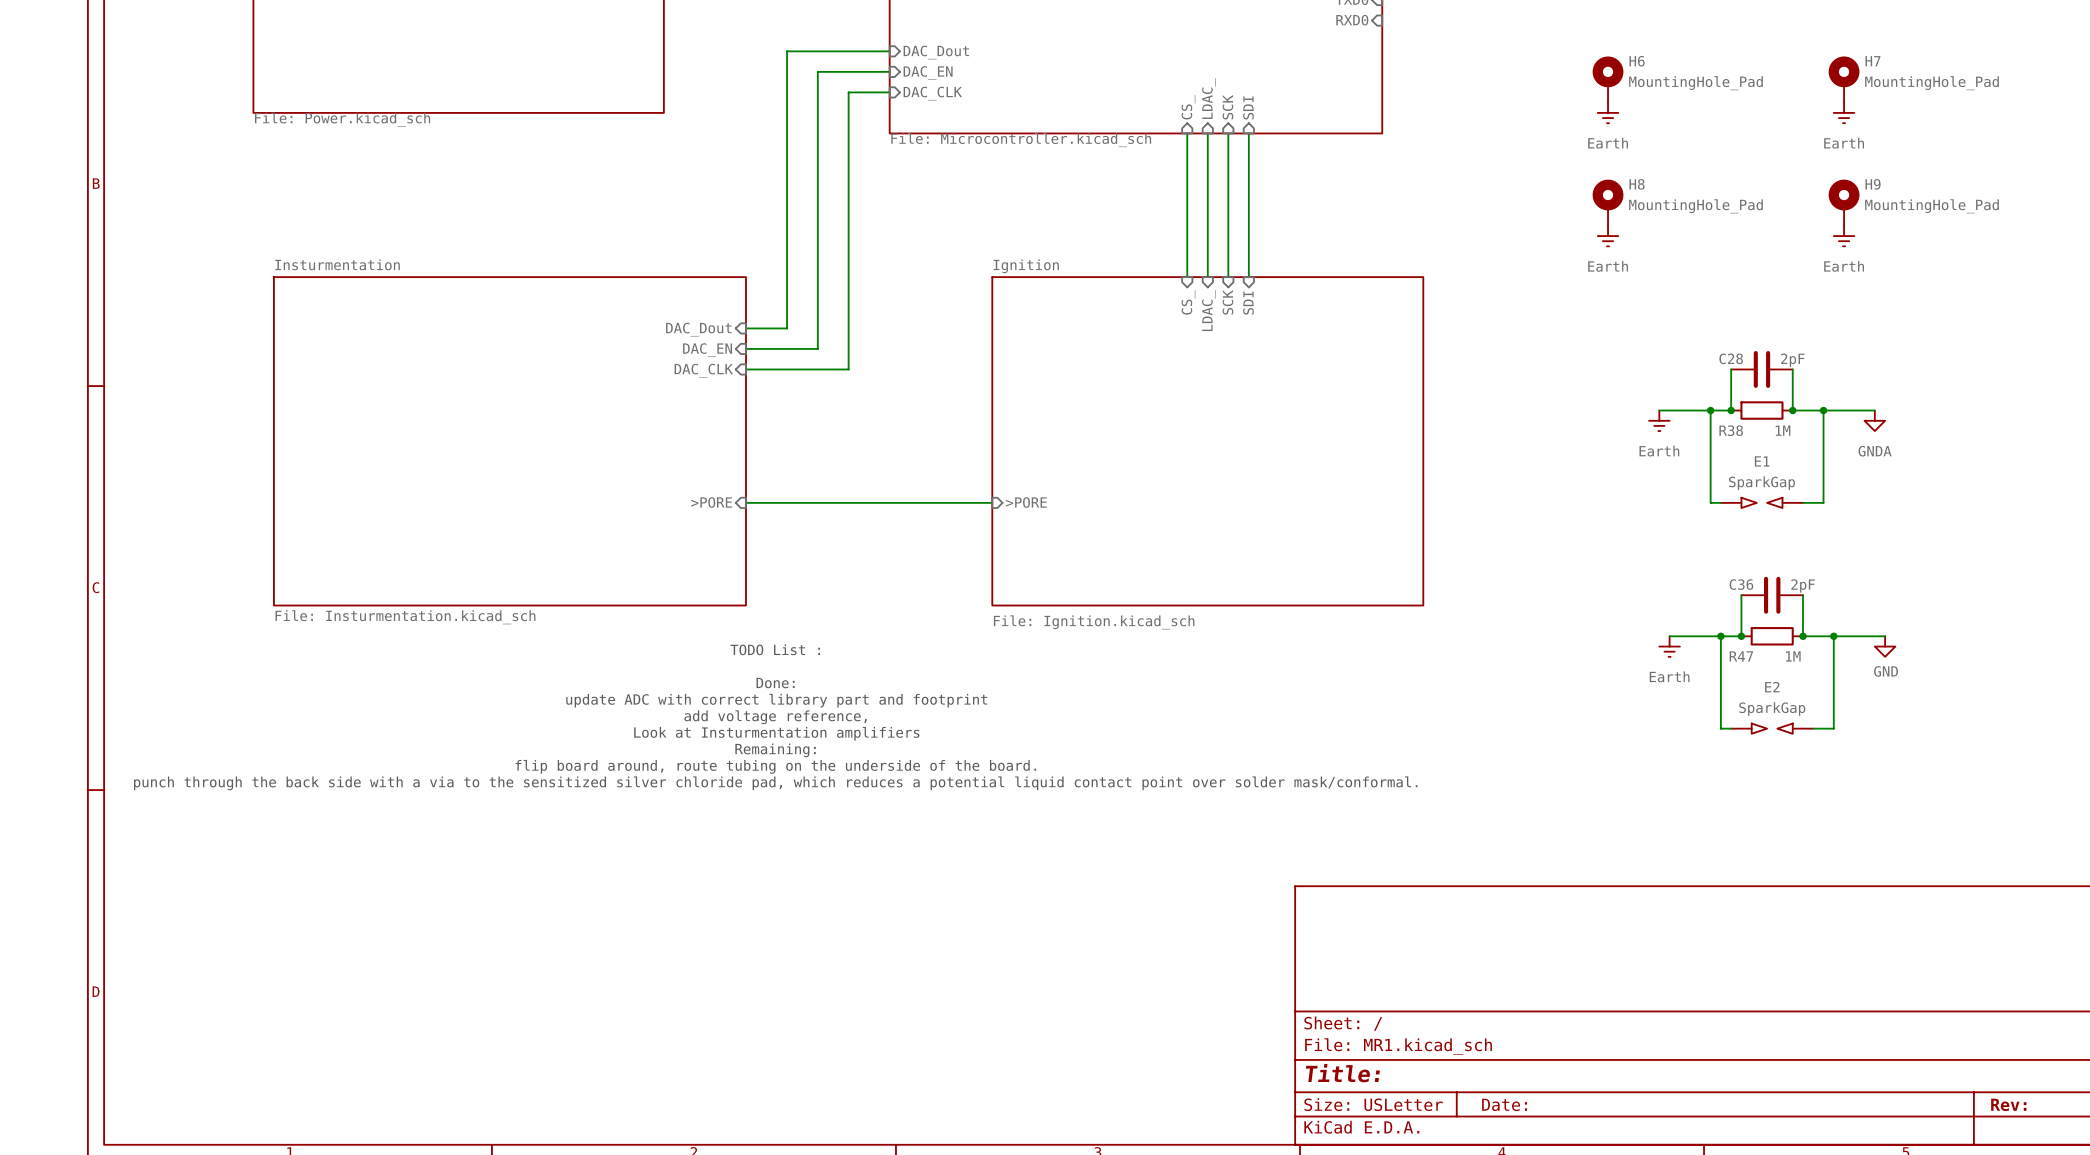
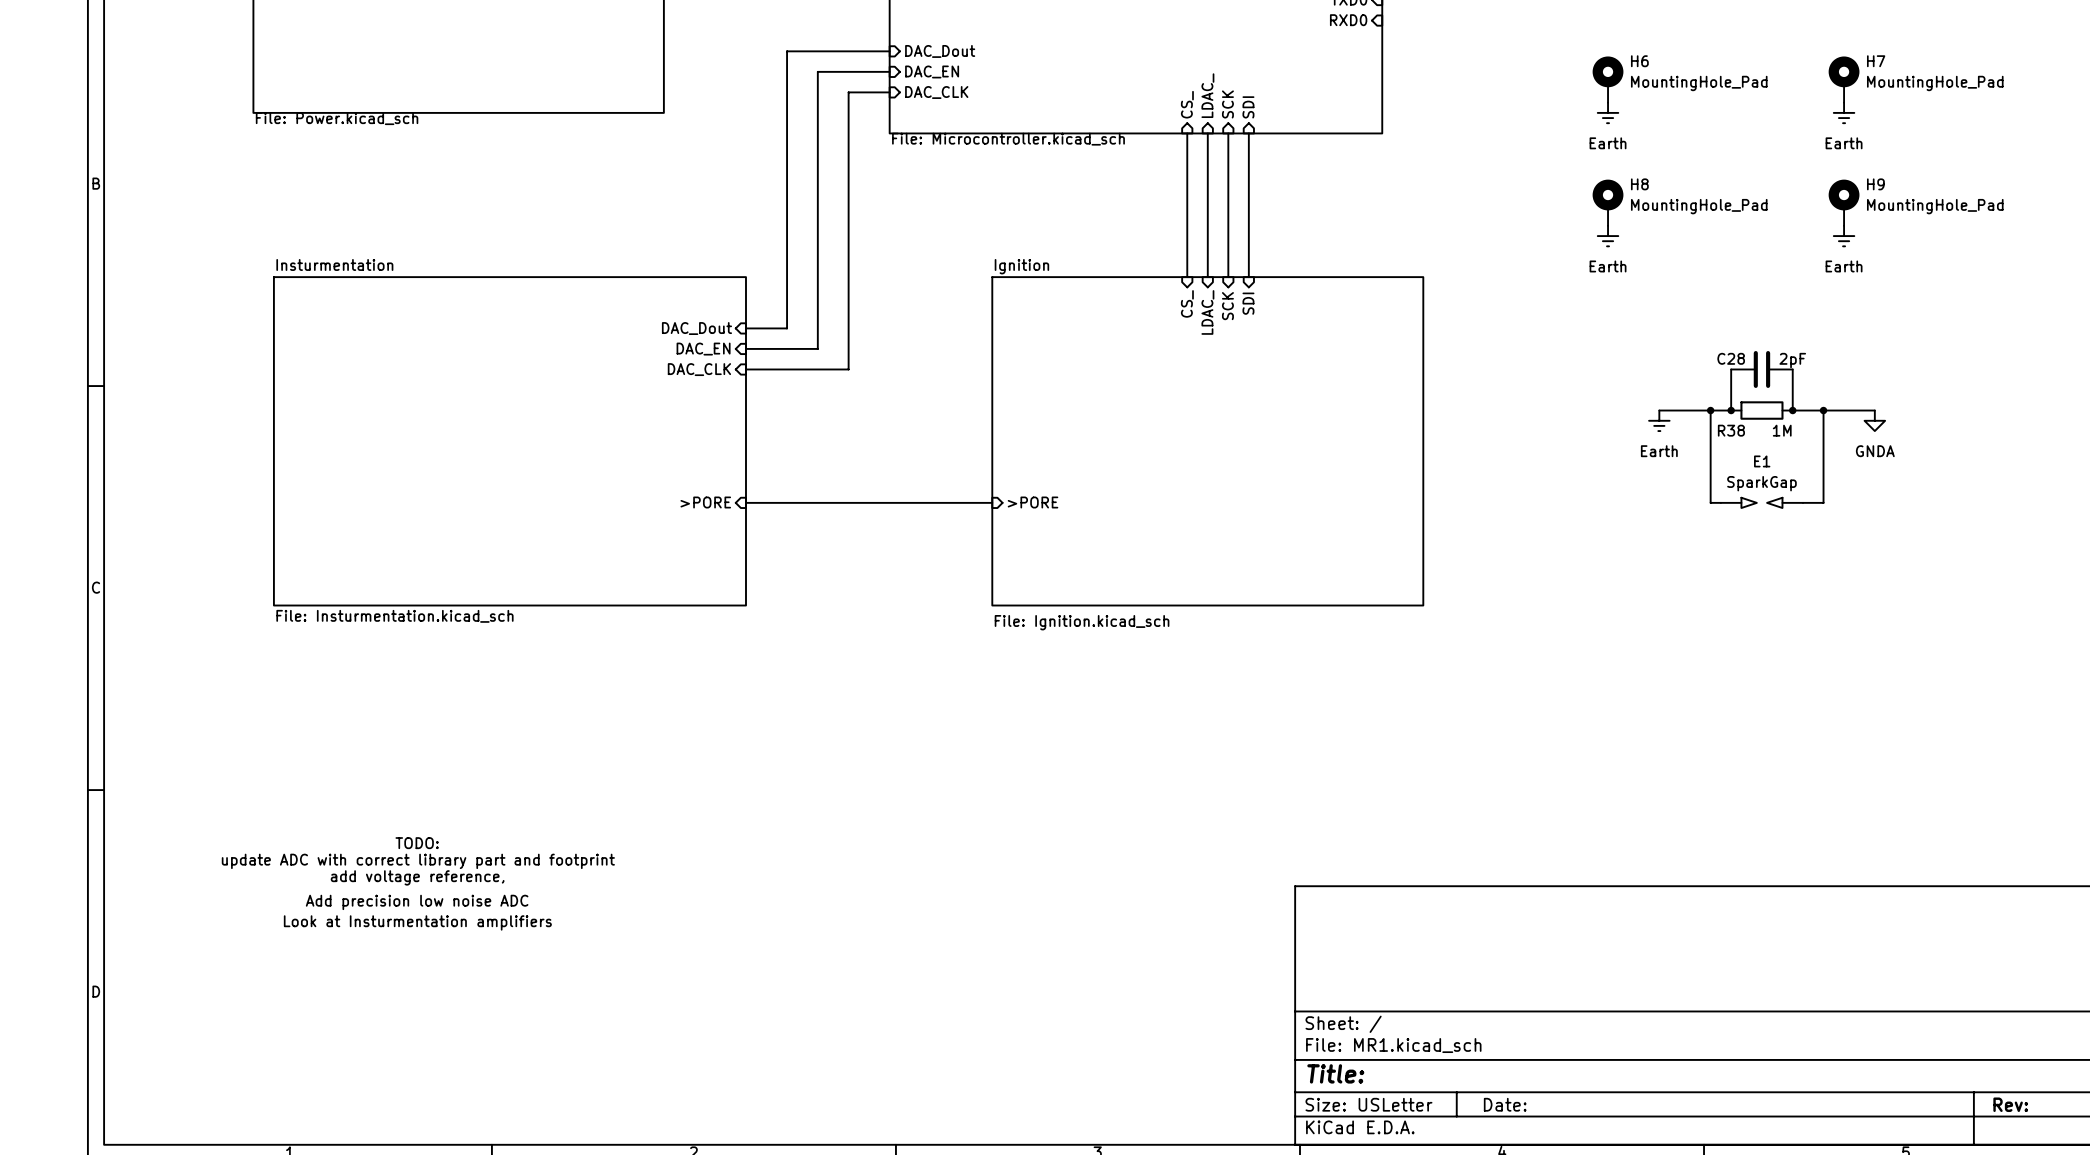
wire: (1741, 595) (1741, 636) (1669, 636) -> none
C36: 2pF (1772, 595) -> none
wire: (1803, 595) (1803, 636) (1885, 636) -> none
wire: (1720, 636) (1720, 728) (1731, 728) -> none
junction: (1720, 636) -> none
junction: (1741, 636) -> none
R47: 1M (1772, 636) -> none
junction: (1803, 636) -> none
wire: (1833, 636) (1833, 728) (1813, 728) -> none
junction: (1833, 636) -> none
power symbol: Earth (1669, 646) -> none
power symbol: GND (1885, 646) -> none
text: TODO List : (775, 649) -> none
text: Done: (775, 683) -> none
text: update ADC with correct library part and footprint (776, 700) -> none
text: add voltage reference, (775, 717) -> none
E2: SparkGap (1772, 728) -> none
text: Look at Insturmentation amplifiers (776, 733) -> none
text: Remaining: (775, 750) -> none
text: flip board around, route tubing on the underside of the board. (775, 766) -> none
text: punch through the back side with a via to the sensitized silver chloride pad, which reduces a potential liquid contact point over solder mask/conformal. (775, 783) -> none
text: none -> TODO: (417, 843)
text: none -> update ADC with correct library part and footprint (418, 861)
text: none -> add voltage reference, (417, 877)
text: none -> Add precision low noise ADC (417, 902)
text: none -> Look at Insturmentation amplifiers (417, 922)

